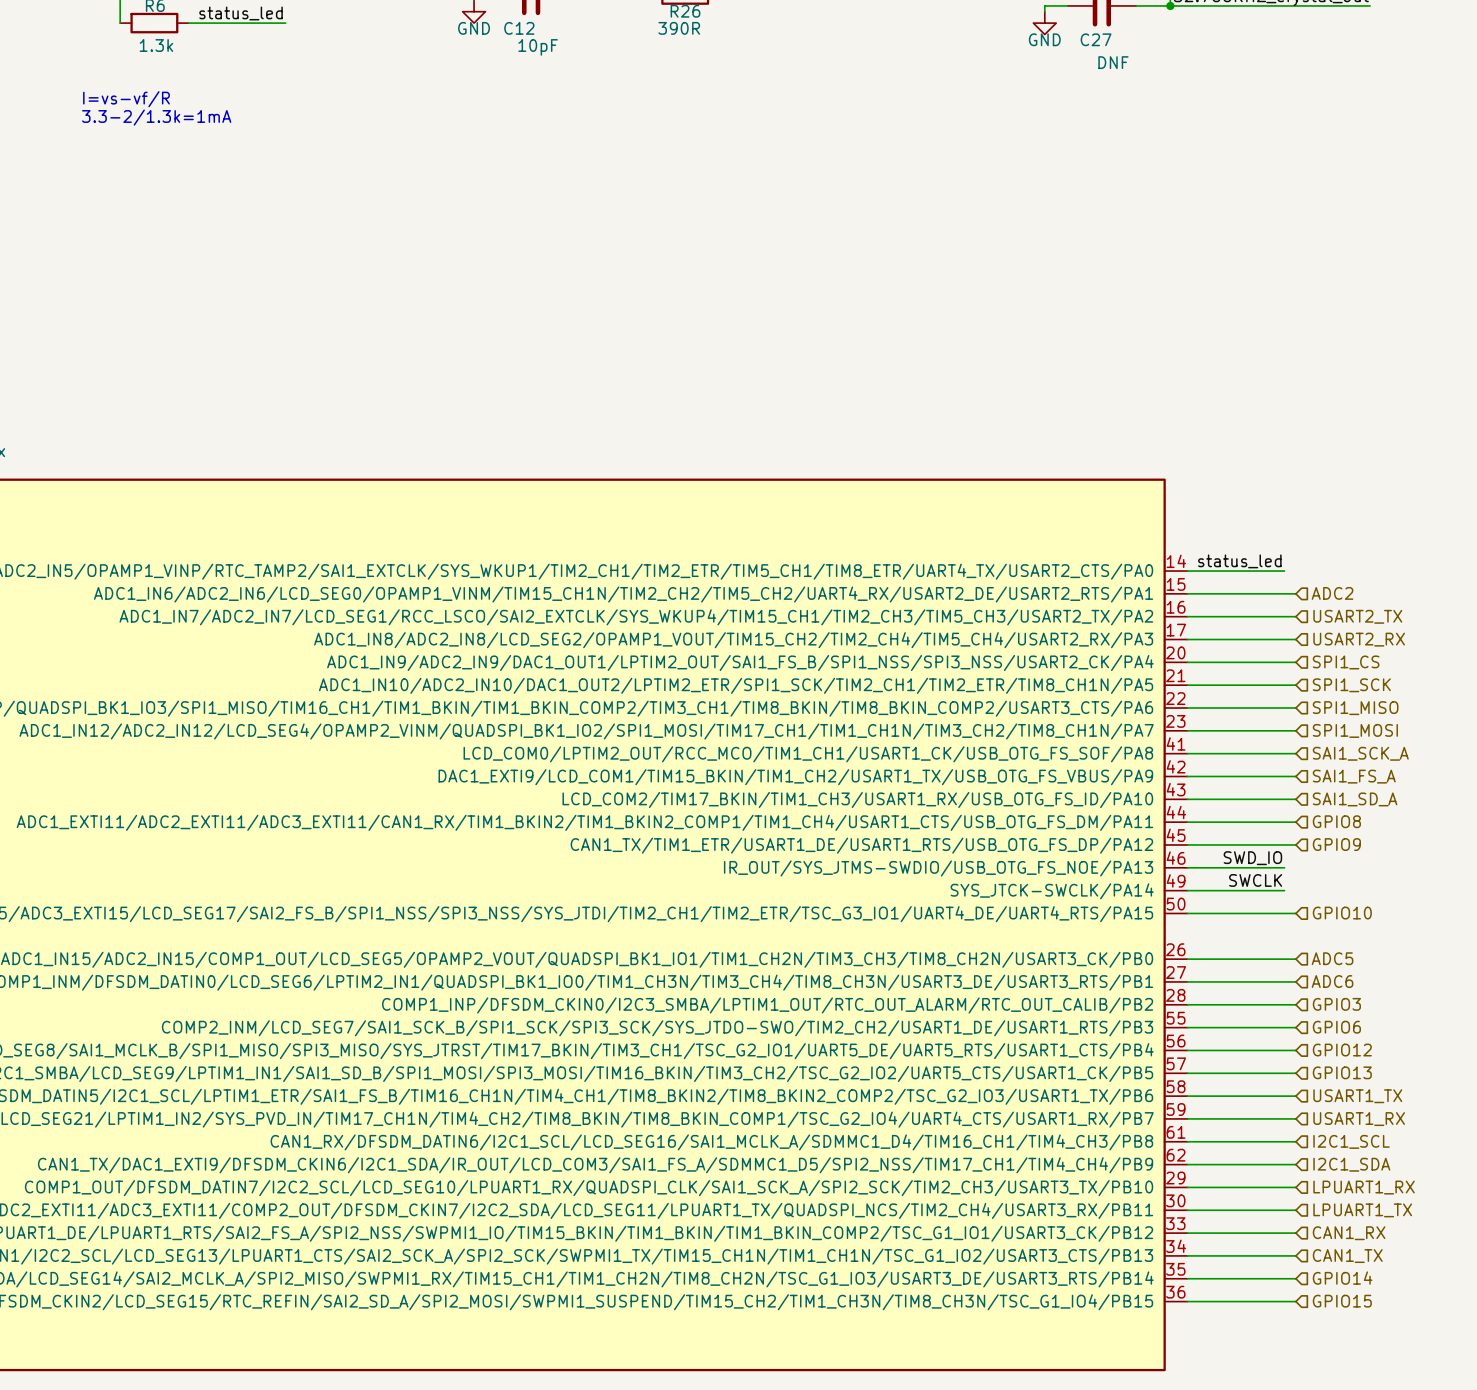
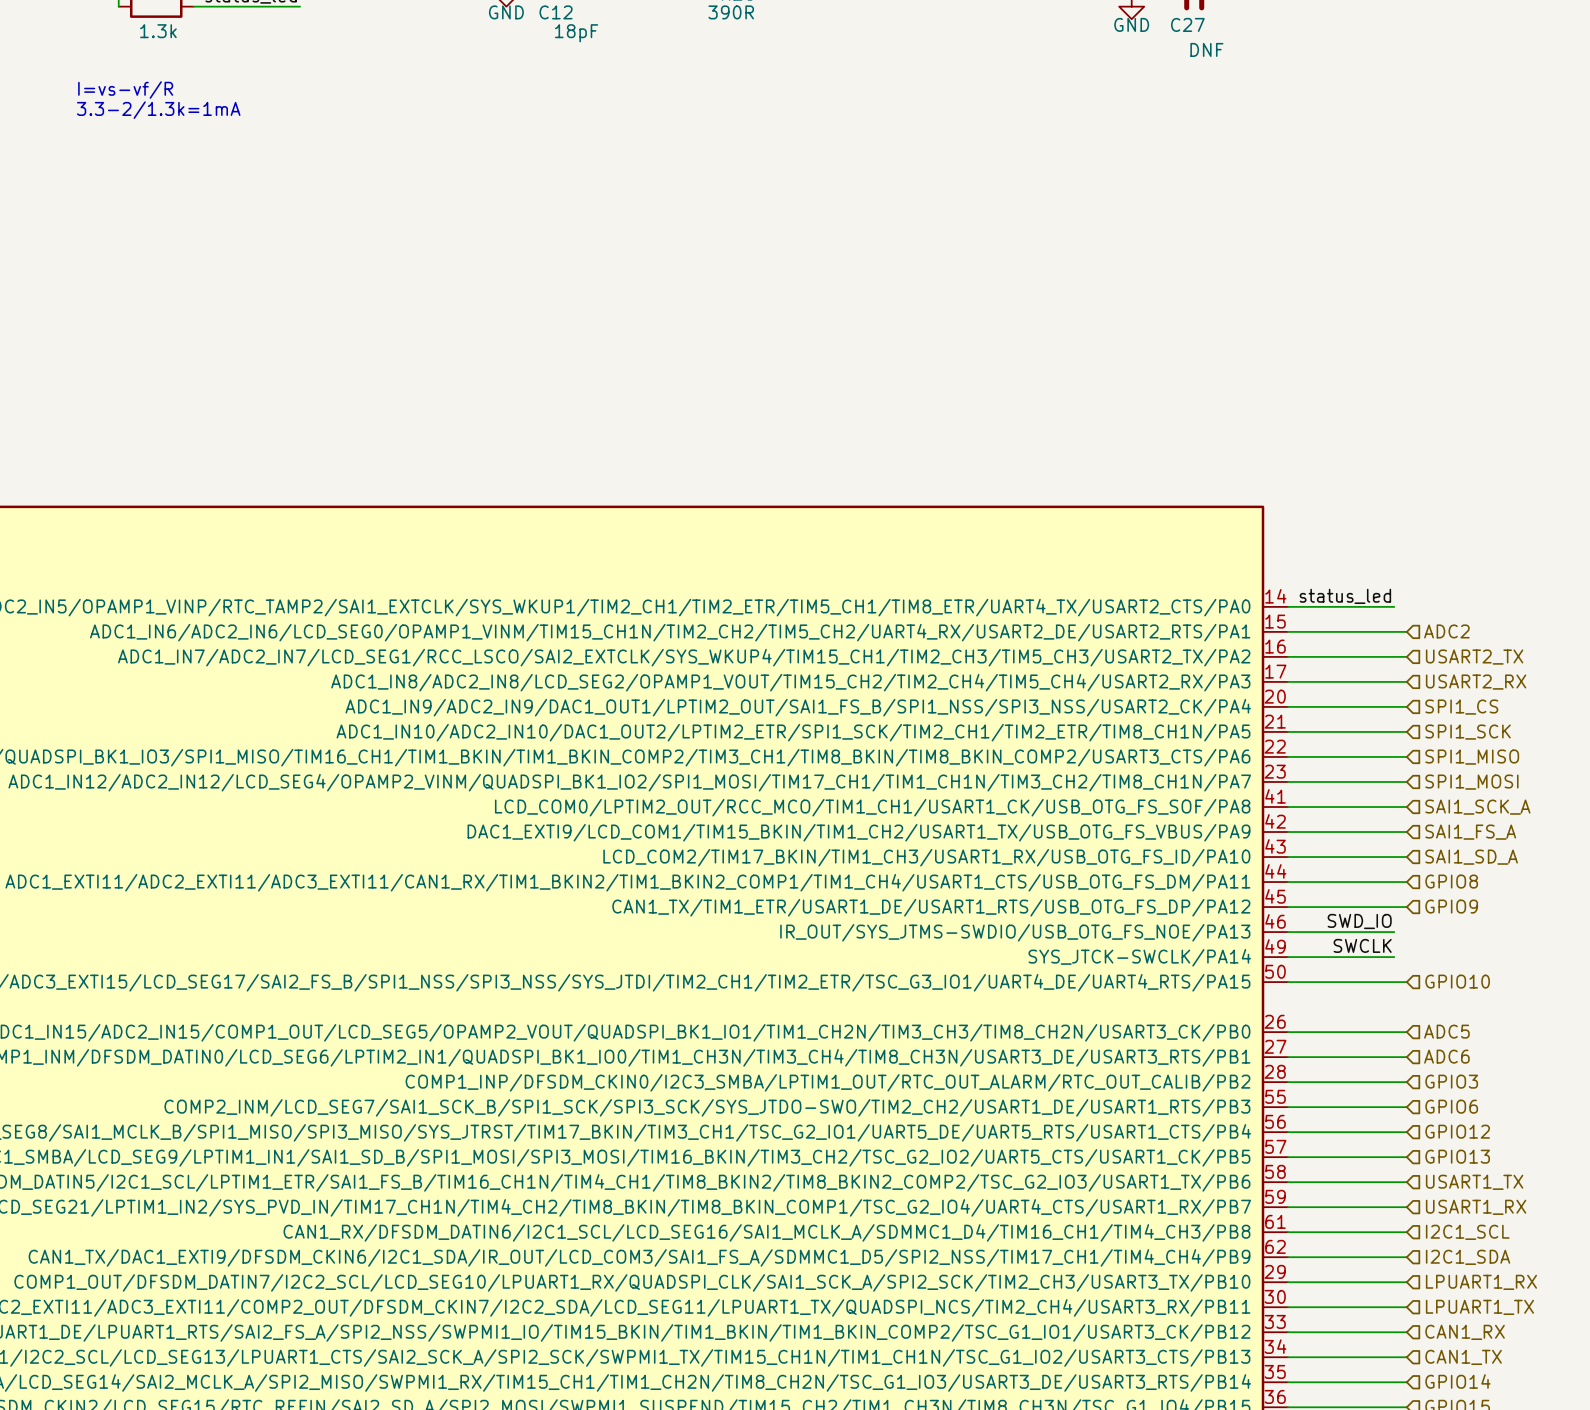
C12 value: 10pF (538, 47) -> 18pF (576, 33)

